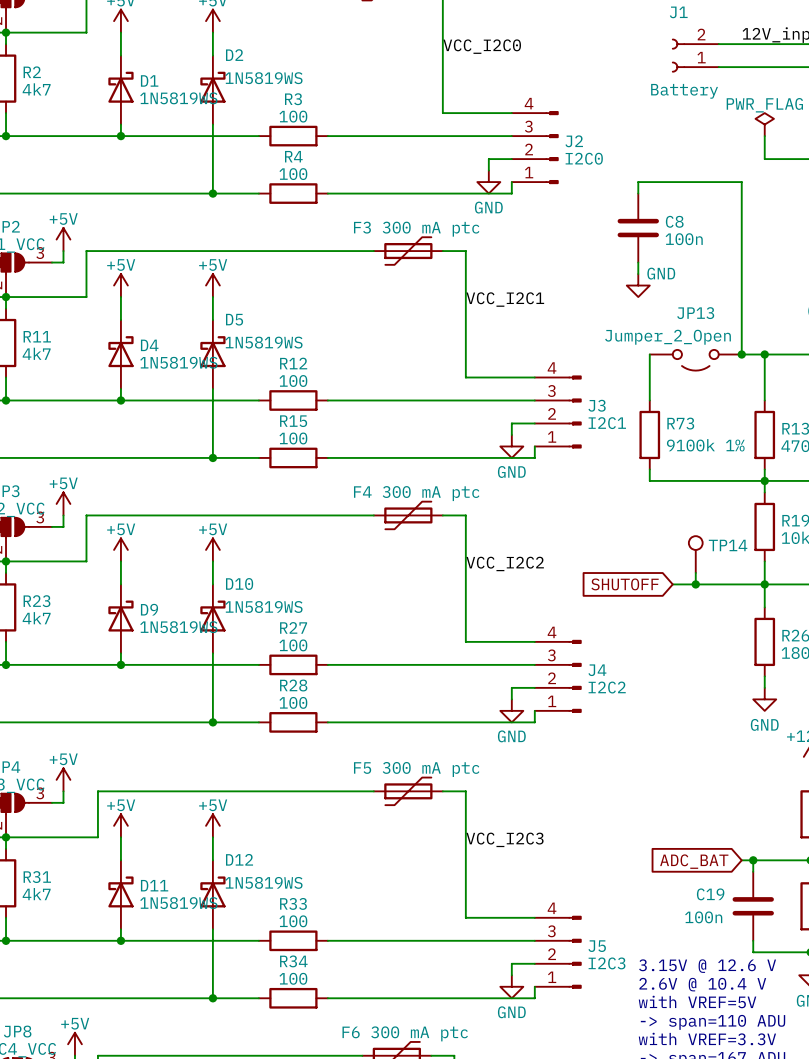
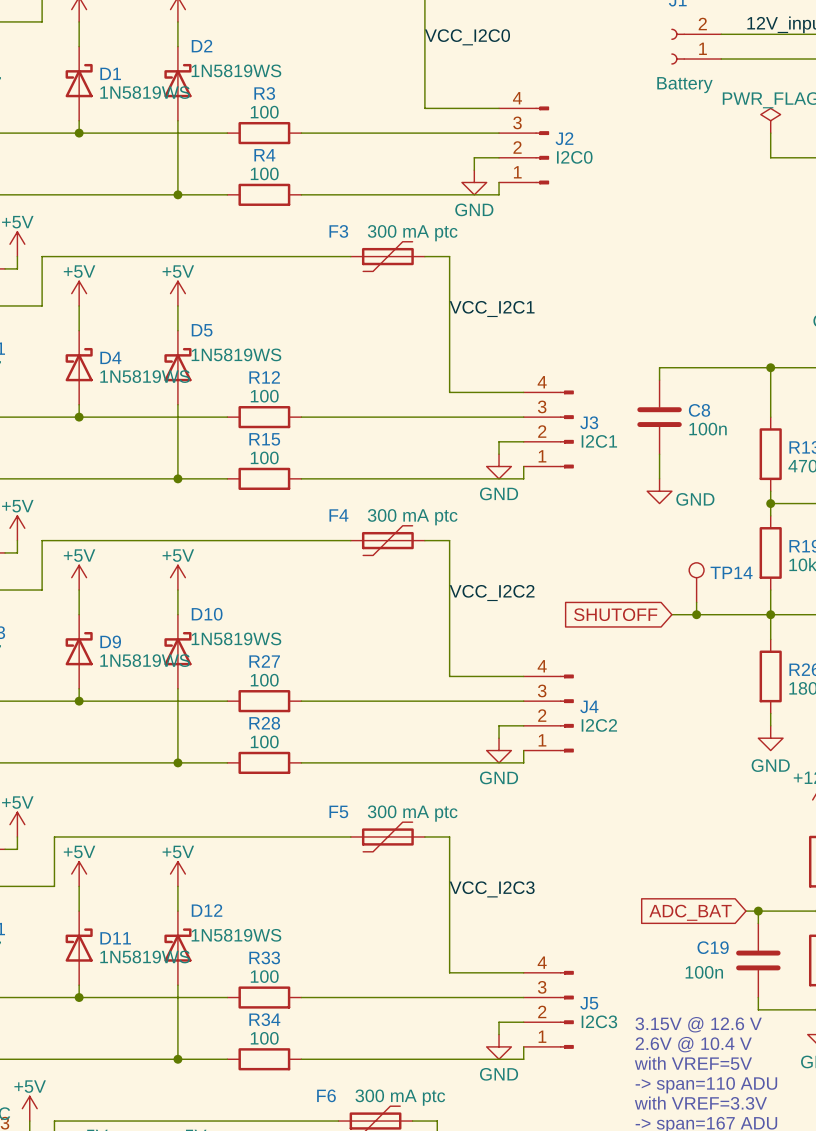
wire: (638, 193) (638, 182) (741, 182) (741, 354) -> (659, 380) (659, 367) (745, 367)
C8 position: (638, 228) -> (659, 417)
wire: (638, 262) (638, 274) -> none
power symbol text position: GND (661, 273) -> GND (695, 499)
power symbol position: GND (638, 285) -> GND (659, 491)
wire: (649, 354) (649, 400) -> none
junction: (741, 354) -> none
JP13: Jumper_2_Open (695, 360) -> none
R73: 9100k 1% (649, 434) -> none
wire: none -> (659, 454) (659, 478)
wire: (649, 469) (649, 480) (764, 480) -> none

